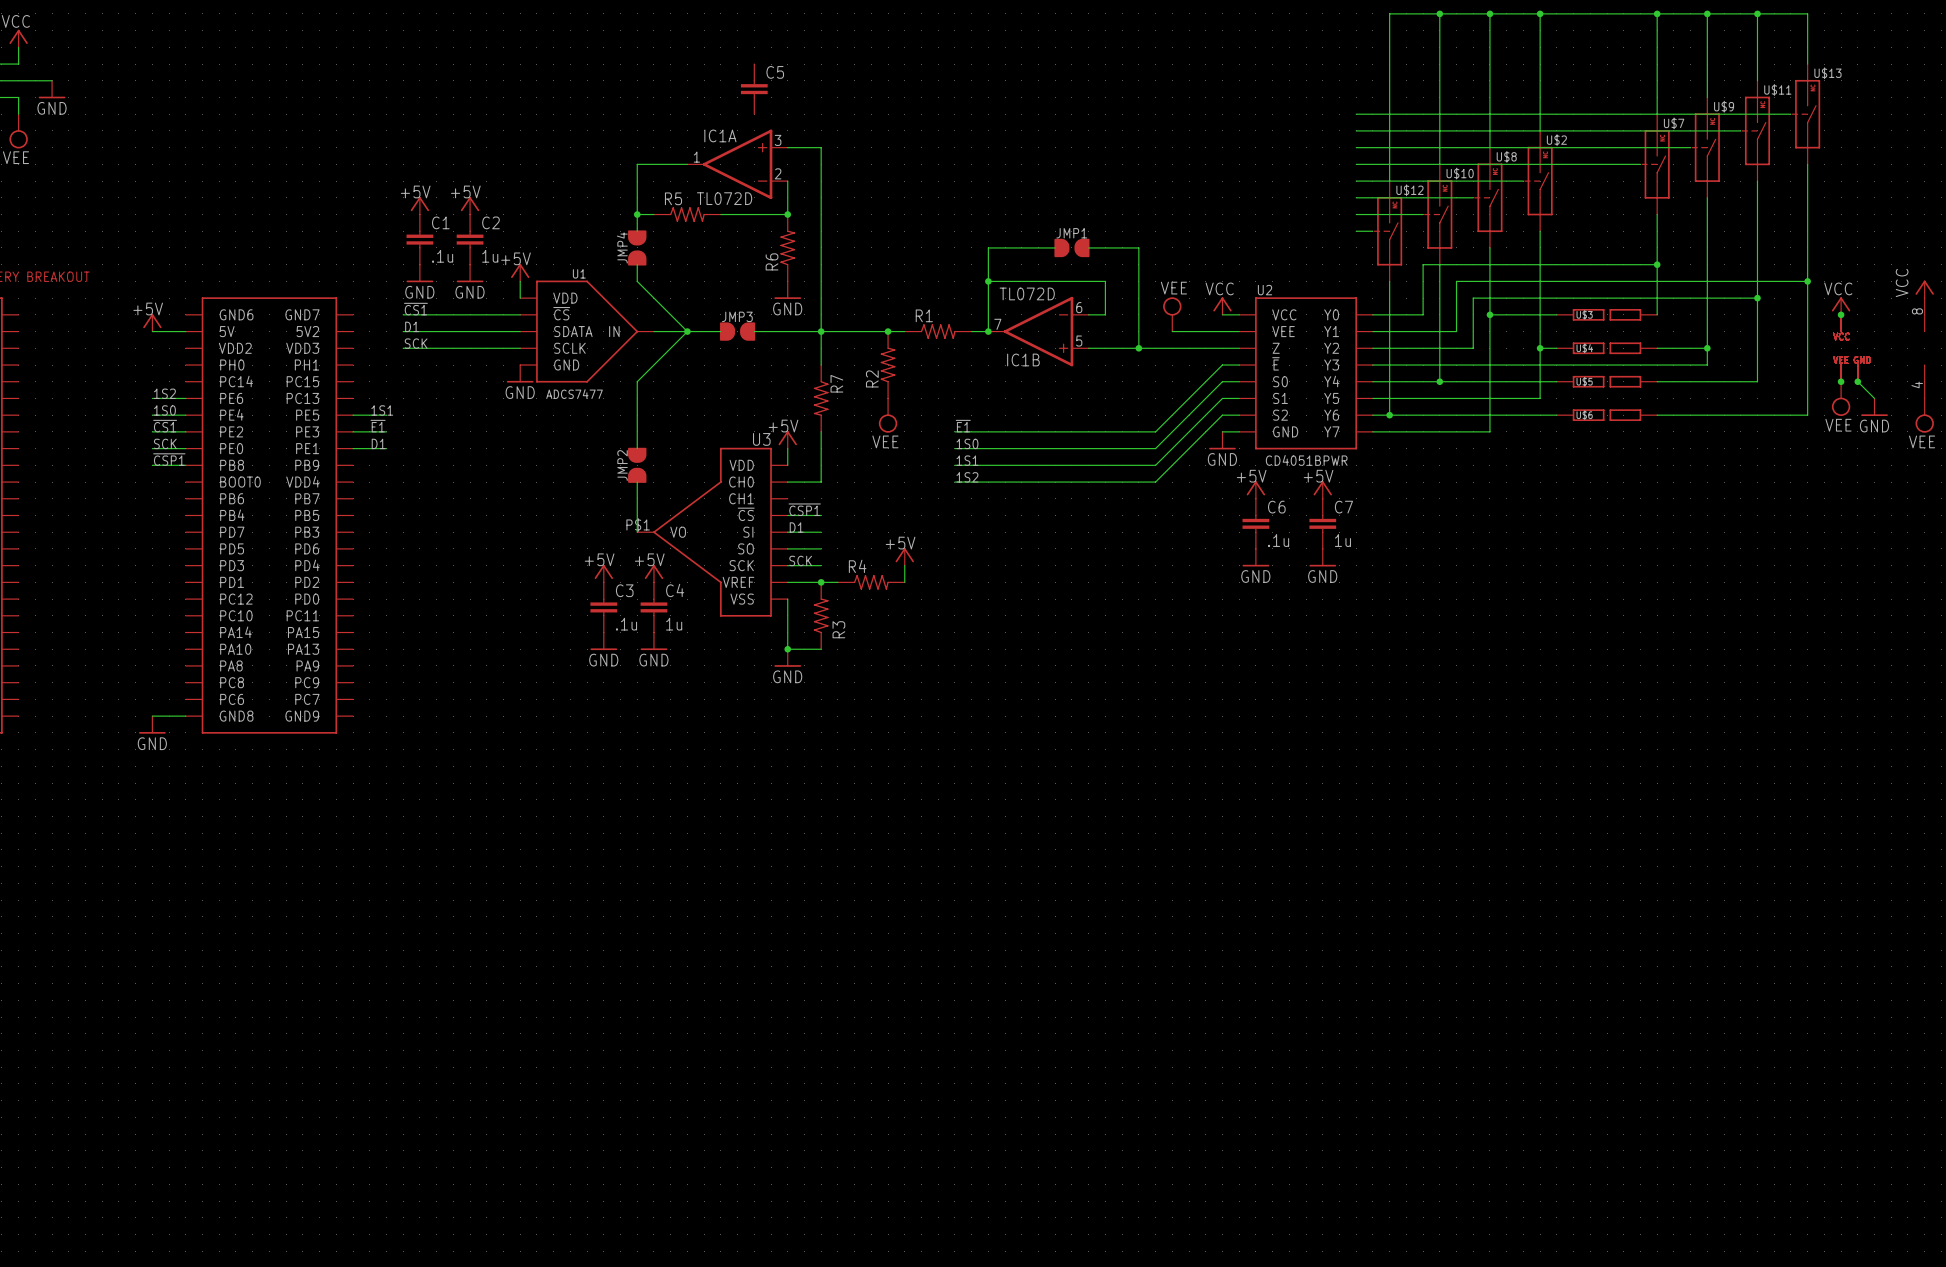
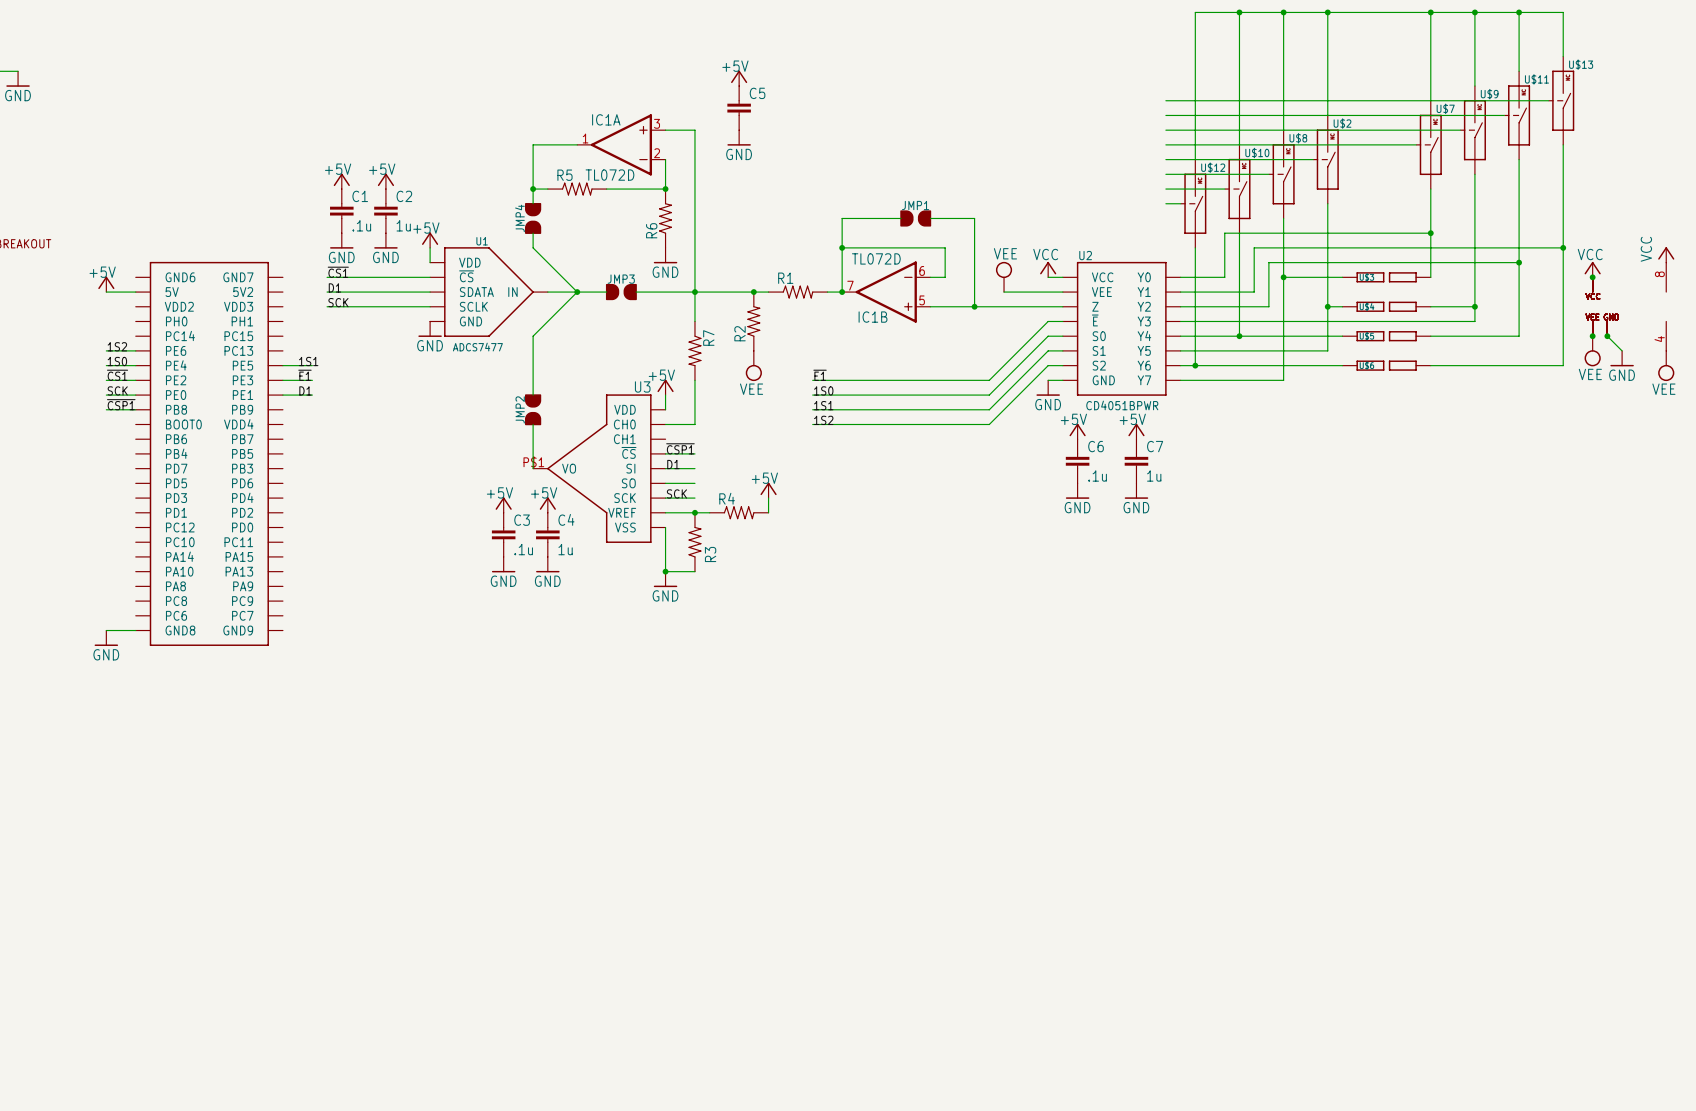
power symbol: none -> +5V (739, 78)
C5 position: (754, 89) -> (739, 108)
power symbol: none -> GND (739, 137)

